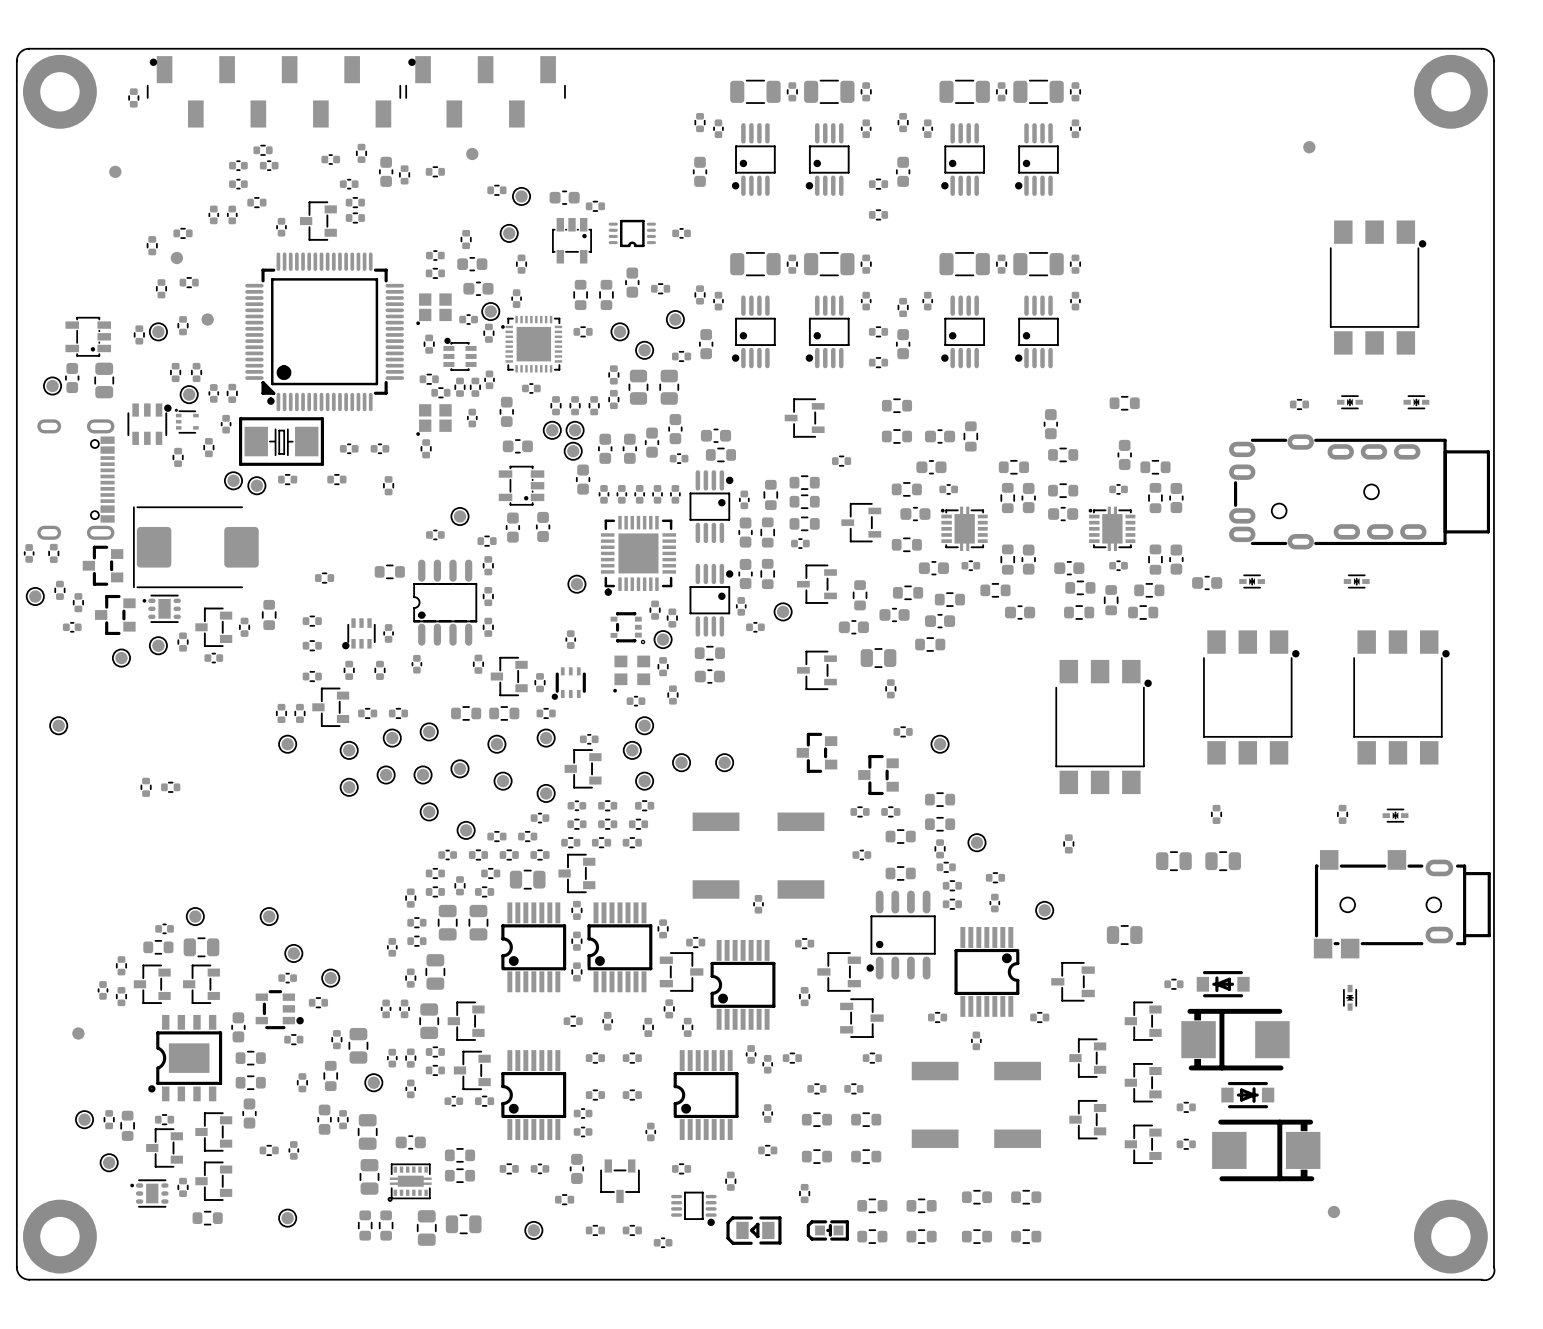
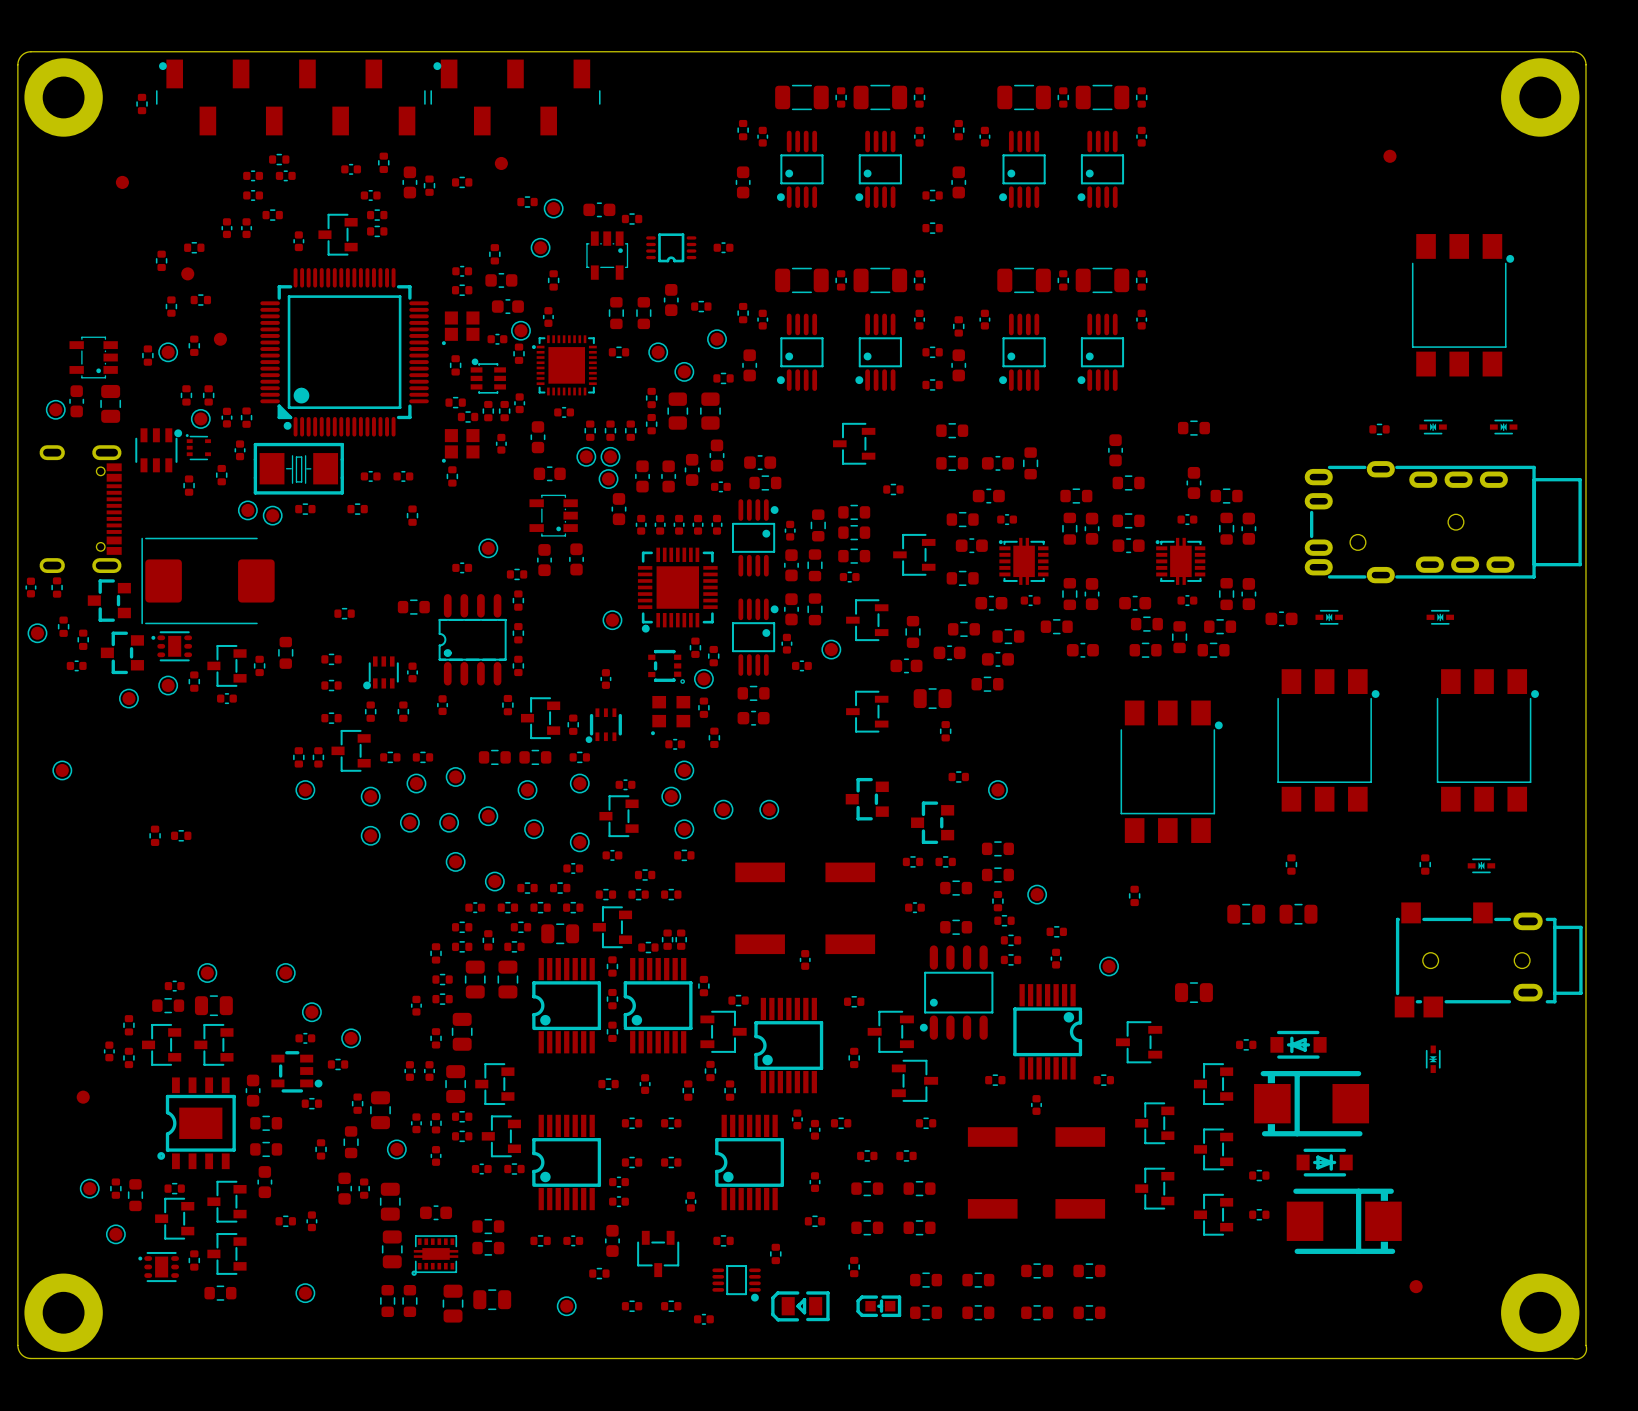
part: (607, 805) -> none
part: (576, 824) -> none
part: (638, 824) -> none
part: none -> (667, 939)
part: none -> (681, 939)
part: none -> (648, 947)

